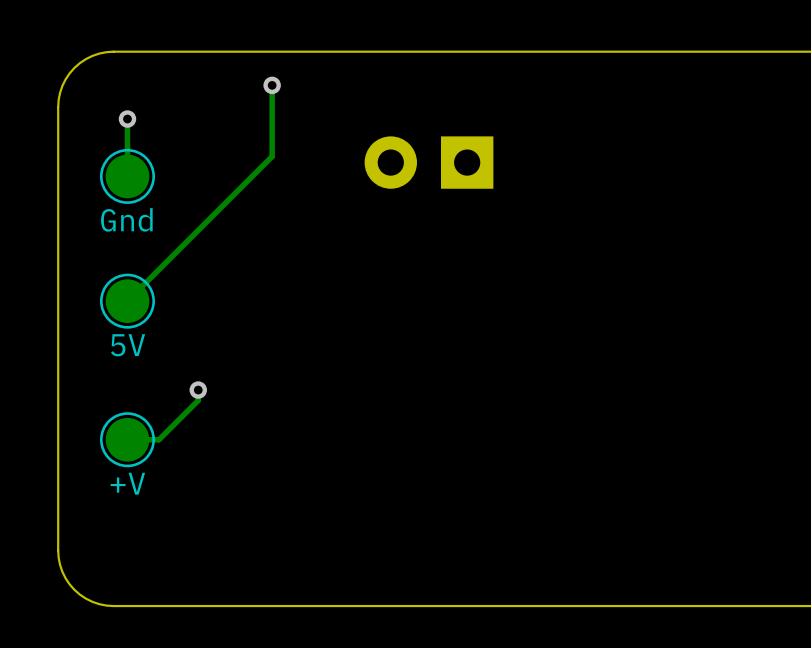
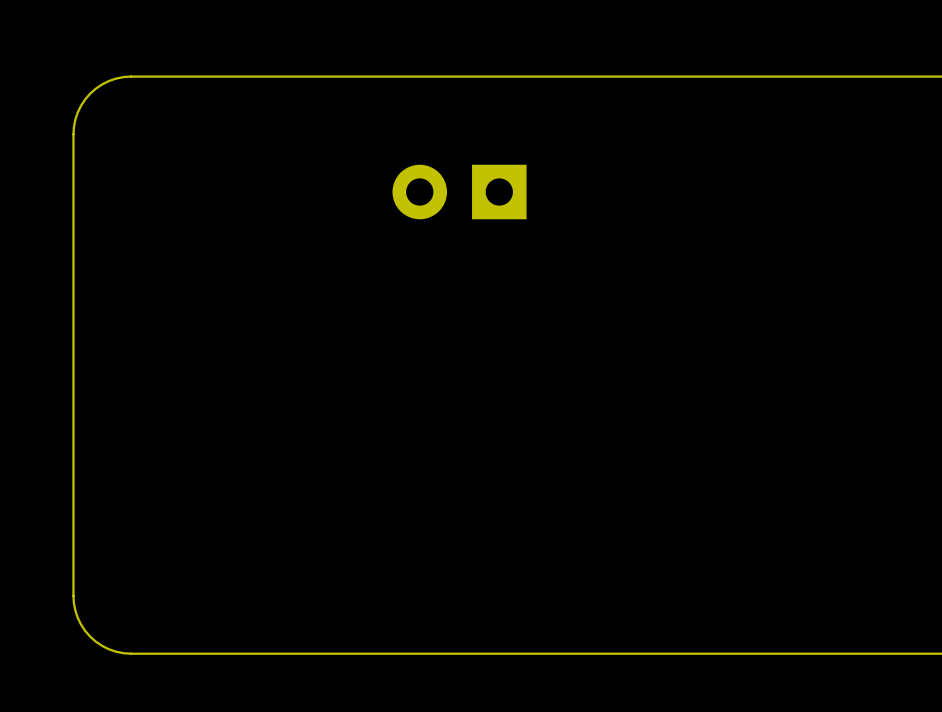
track: (272, 85) (272, 156) (127, 301) -> none
via: (272, 85) -> none
track: (127, 119) (127, 176) -> none
via: (127, 119) -> none
part: Gnd (127, 176) -> none
part: 5V (127, 301) -> none
track: (198, 390) (198, 400) (159, 439) (127, 439) -> none
via: (198, 390) -> none
part: +V (127, 439) -> none

